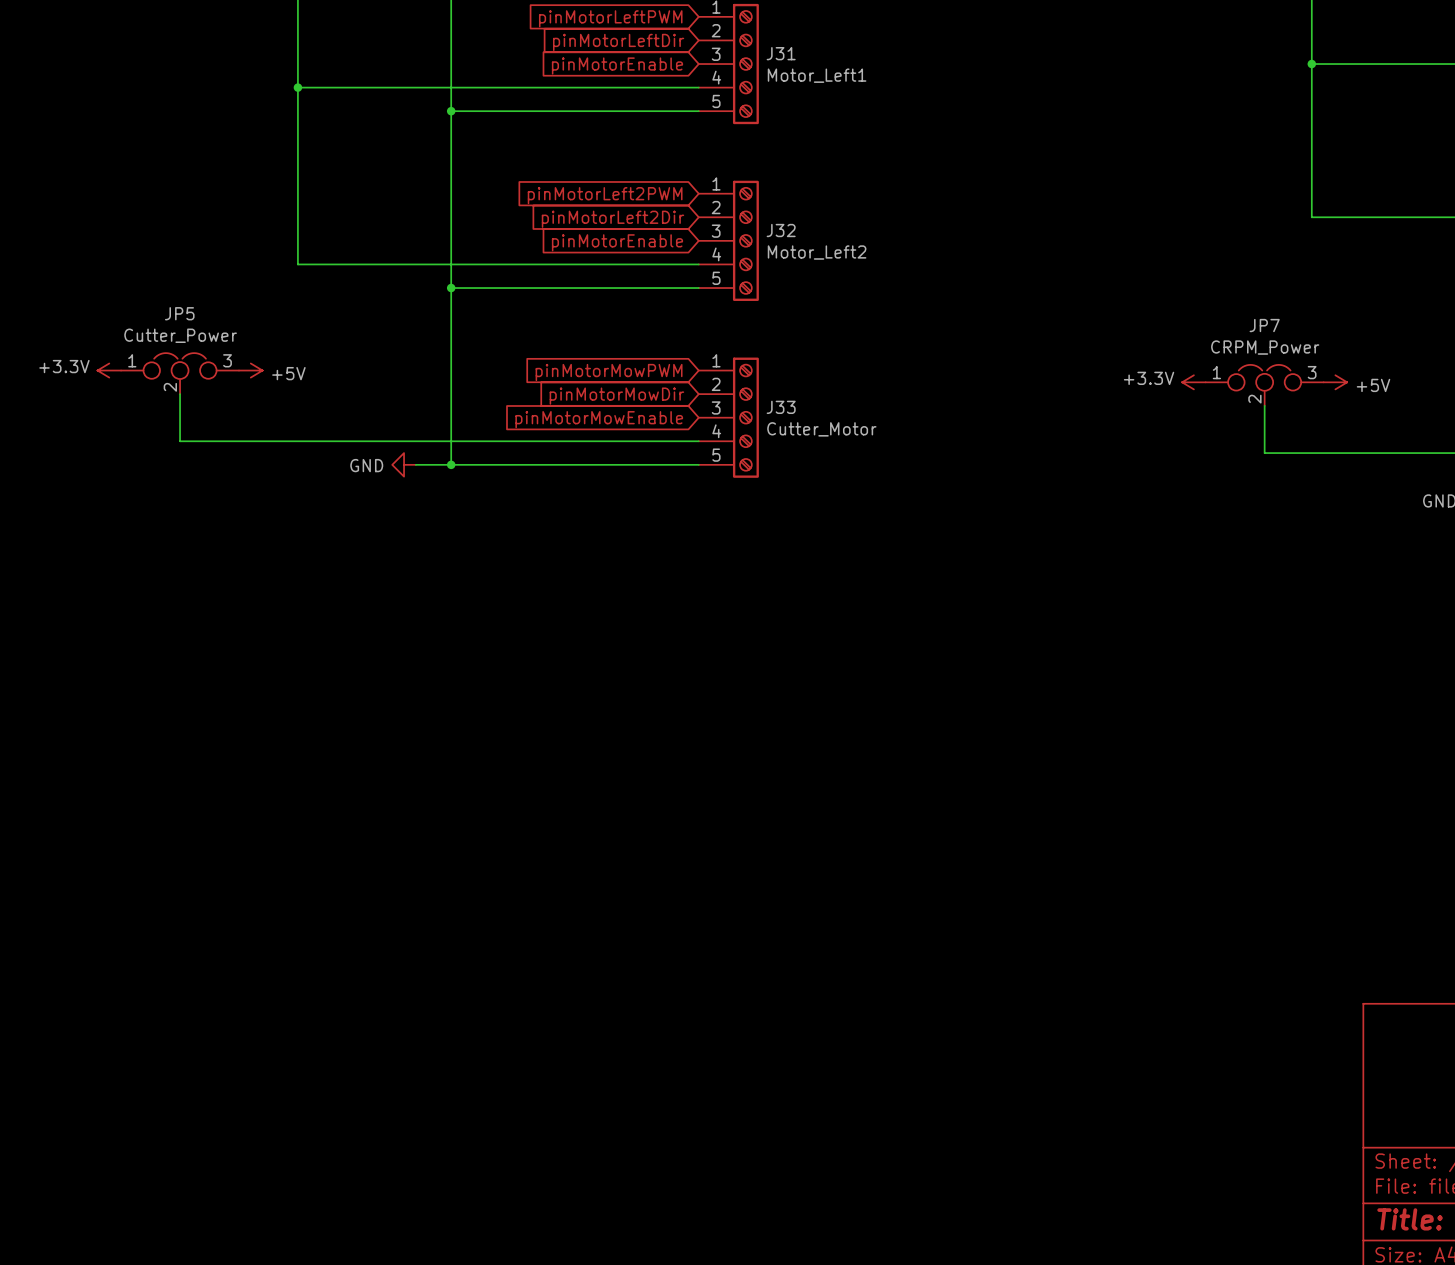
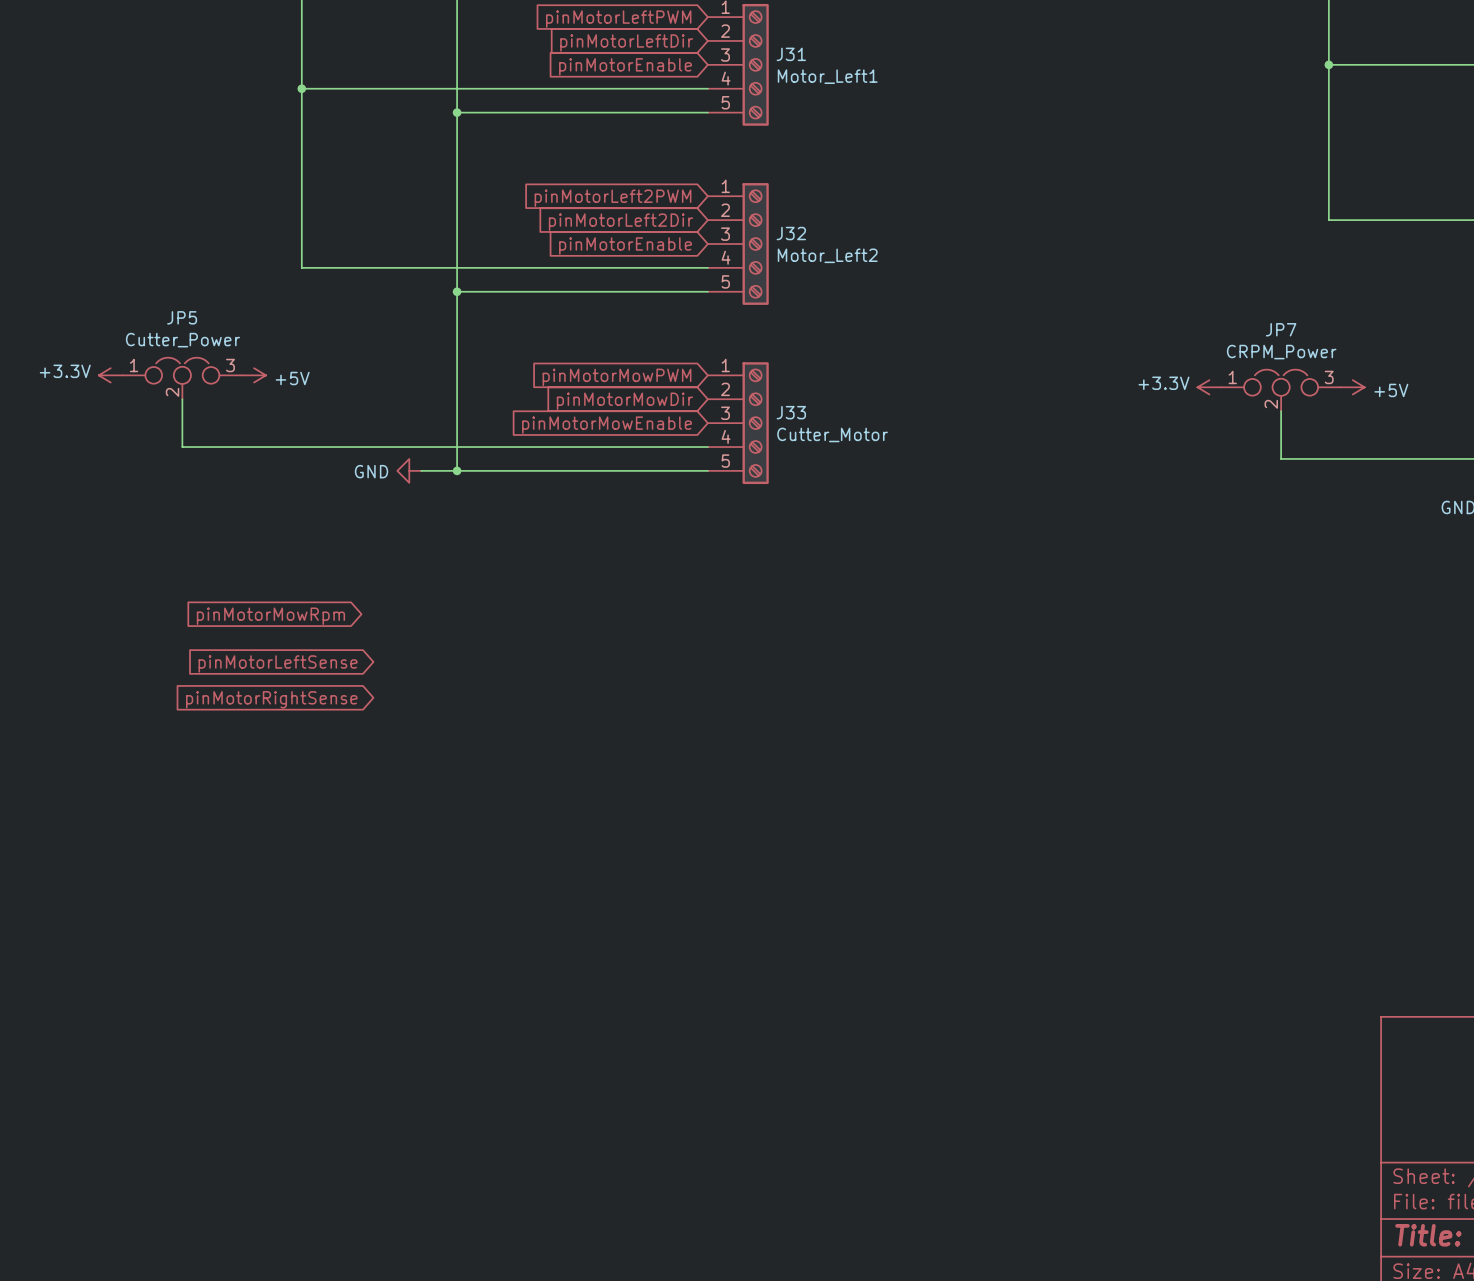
global label: none -> pinMotorMowRpm (270, 616)
global label: none -> pinMotorLeftSense (278, 663)
global label: none -> pinMotorRightSense (271, 699)

